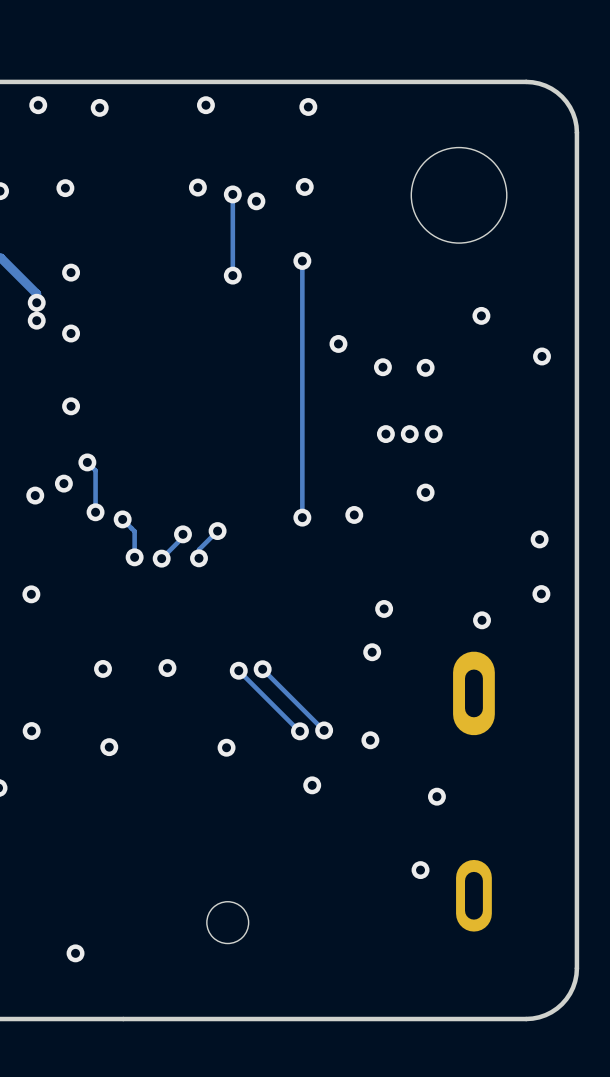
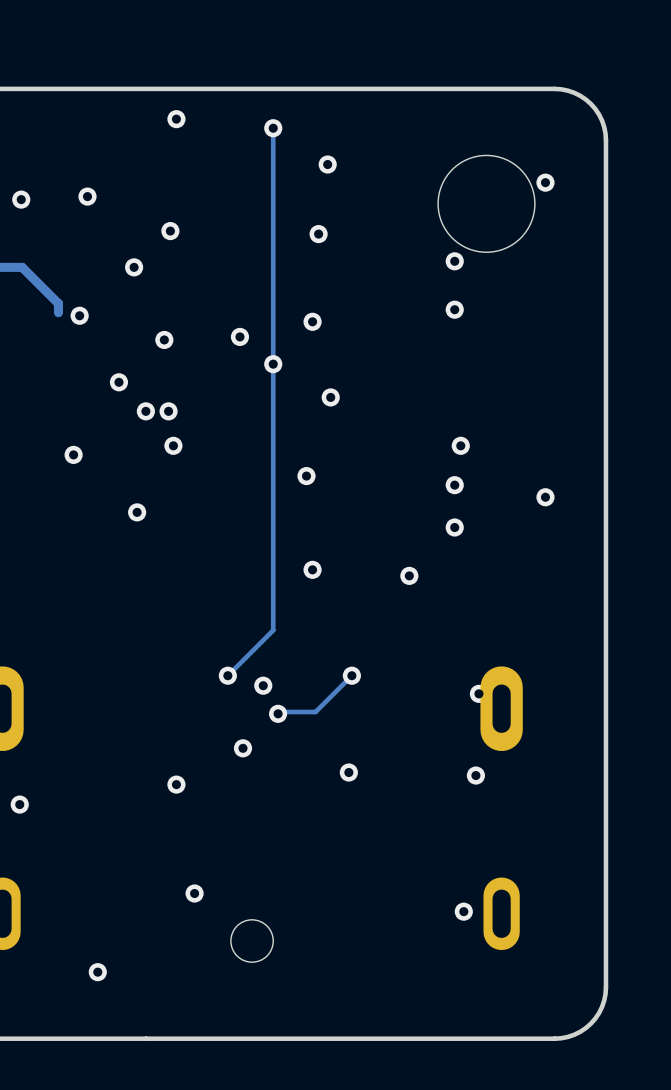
via: (38, 105) -> none
via: (205, 105) -> none
via: (308, 106) -> none
via: (99, 107) -> none
via: none -> (176, 119)
track: none -> (273, 128) (273, 630) (227, 675)
via: none -> (273, 128)
via: none -> (327, 164)
via: none -> (545, 182)
via: (304, 186) -> none
via: (197, 187) -> none
track: (232, 194) (232, 275) -> none
via: (232, 194) -> none
via: (256, 201) -> none
via: none -> (170, 231)
via: none -> (318, 234)
via: none -> (454, 261)
via: none -> (134, 267)
track: (302, 260) (302, 517) -> none
via: (302, 260) -> none
via: (71, 272) -> none
via: (232, 275) -> none
via: none -> (454, 309)
via: (36, 302) -> none
via: none -> (79, 315)
via: none -> (312, 321)
via: (481, 315) -> none
via: (36, 320) -> none
via: none -> (239, 336)
via: none -> (164, 339)
via: (71, 333) -> none
via: (338, 343) -> none
via: none -> (273, 364)
via: (542, 356) -> none
via: (382, 367) -> none
via: (425, 367) -> none
via: none -> (118, 382)
via: none -> (330, 397)
via: none -> (145, 411)
via: none -> (168, 411)
via: (71, 406) -> none
via: none -> (173, 445)
via: (385, 434) -> none
via: (409, 434) -> none
via: none -> (73, 454)
track: (87, 462) (95, 470) (95, 512) -> none
via: (87, 462) -> none
via: none -> (306, 476)
via: none -> (454, 485)
via: (63, 483) -> none
via: none -> (545, 497)
via: (425, 492) -> none
via: (35, 495) -> none
via: none -> (137, 512)
via: (95, 512) -> none
via: (354, 514) -> none
via: none -> (454, 527)
via: (302, 517) -> none
track: (122, 519) (134, 531) (134, 557) -> none
via: (122, 519) -> none
track: (217, 531) (199, 549) (199, 558) -> none
via: (217, 531) -> none
track: (182, 534) (182, 537) (161, 558) -> none
via: (182, 534) -> none
via: (539, 539) -> none
via: none -> (312, 569)
via: (134, 557) -> none
via: (161, 558) -> none
via: (199, 558) -> none
via: none -> (409, 575)
via: (31, 594) -> none
via: (541, 594) -> none
via: (384, 608) -> none
via: (482, 620) -> none
via: (372, 652) -> none
via: none -> (227, 675)
track: none -> (351, 675) (315, 712) (279, 712) (278, 713)
via: none -> (351, 675)
via: (102, 668) -> none
via: (167, 668) -> none
track: (262, 669) (323, 730) -> none
via: (262, 669) -> none
track: (238, 670) (299, 731) -> none
via: none -> (478, 693)
via: none -> (278, 713)
via: (324, 730) -> none
via: (31, 731) -> none
via: (299, 731) -> none
via: (370, 740) -> none
via: (109, 747) -> none
via position: (226, 747) -> (242, 748)
via: none -> (348, 772)
via: none -> (176, 784)
via: (312, 785) -> none
via position: (436, 796) -> (475, 775)
via position: (420, 870) -> (463, 911)
via: none -> (194, 893)

